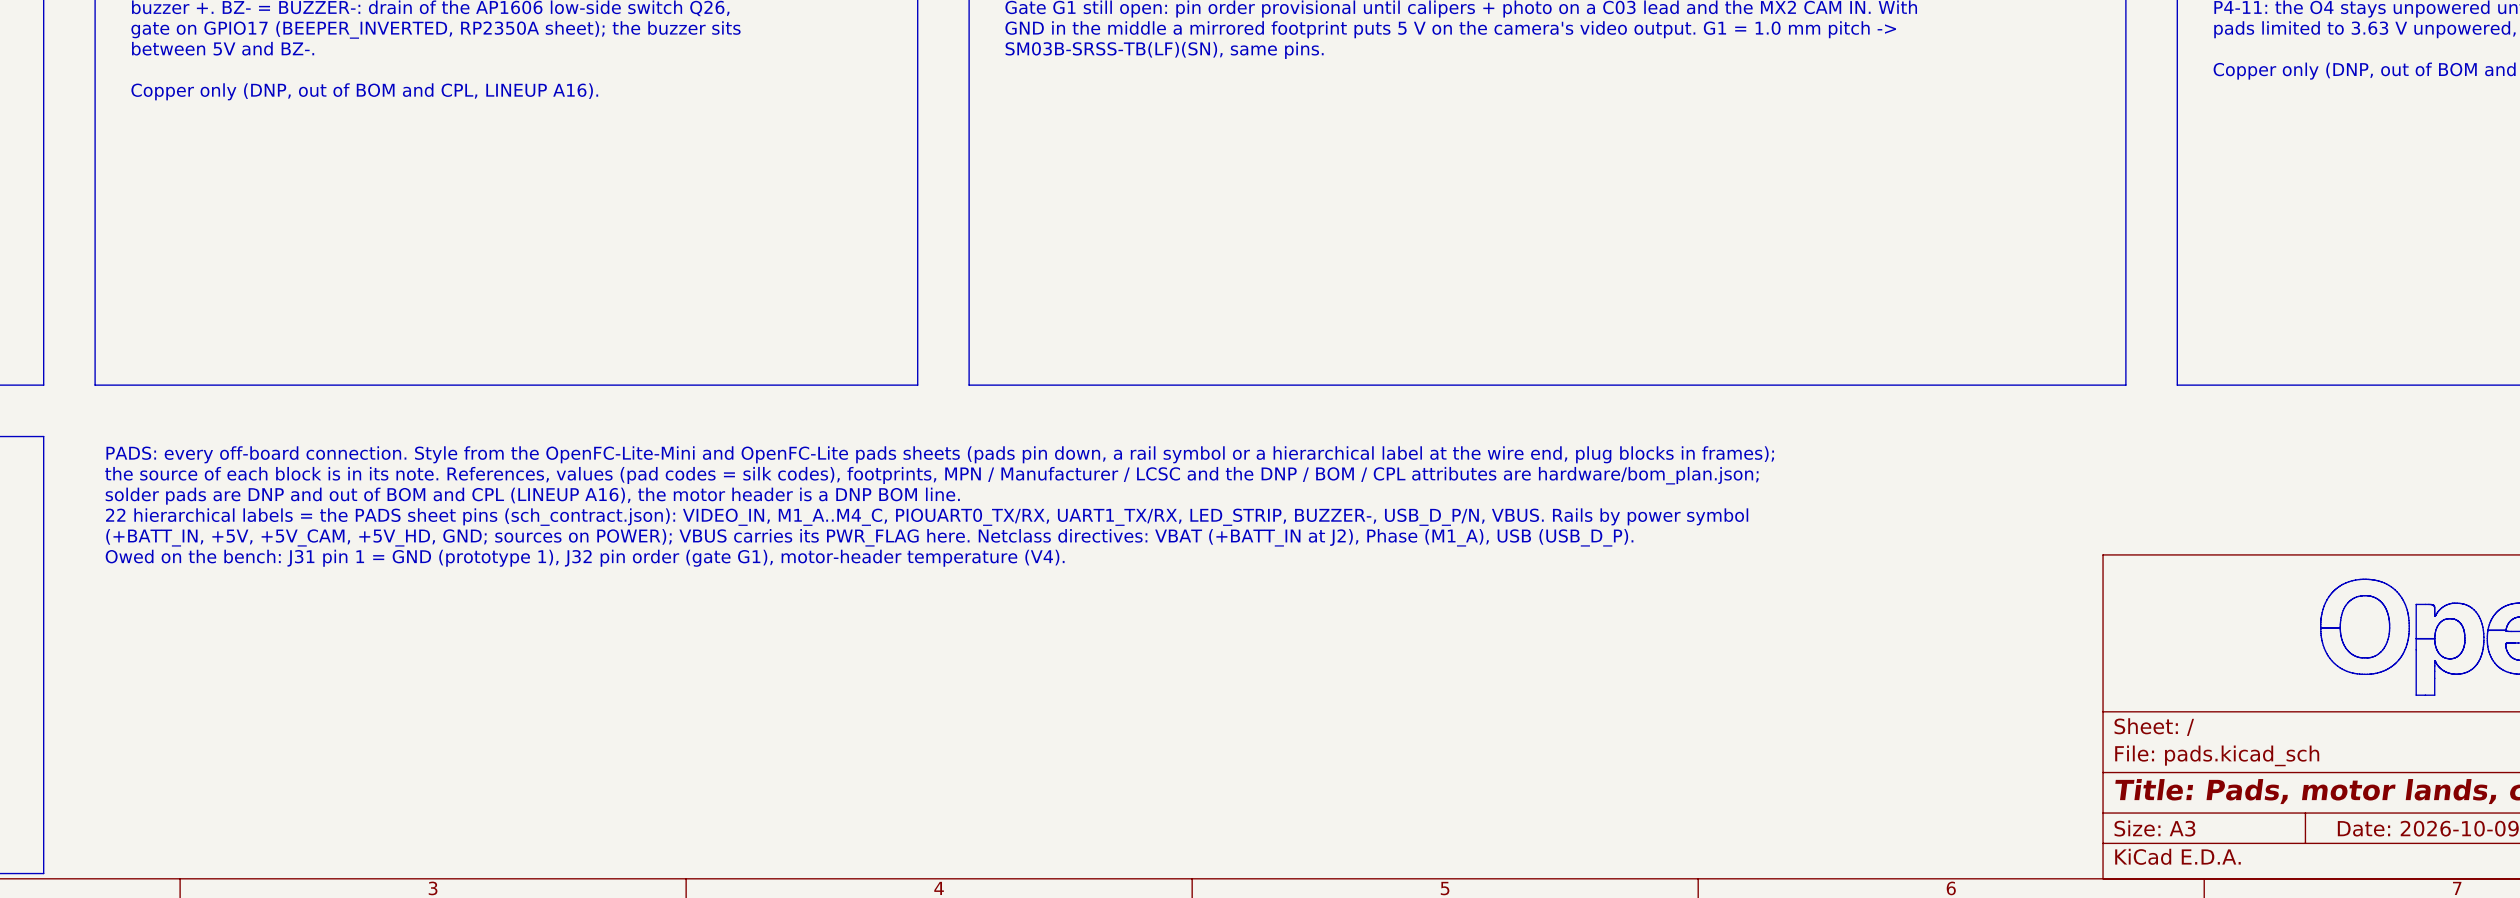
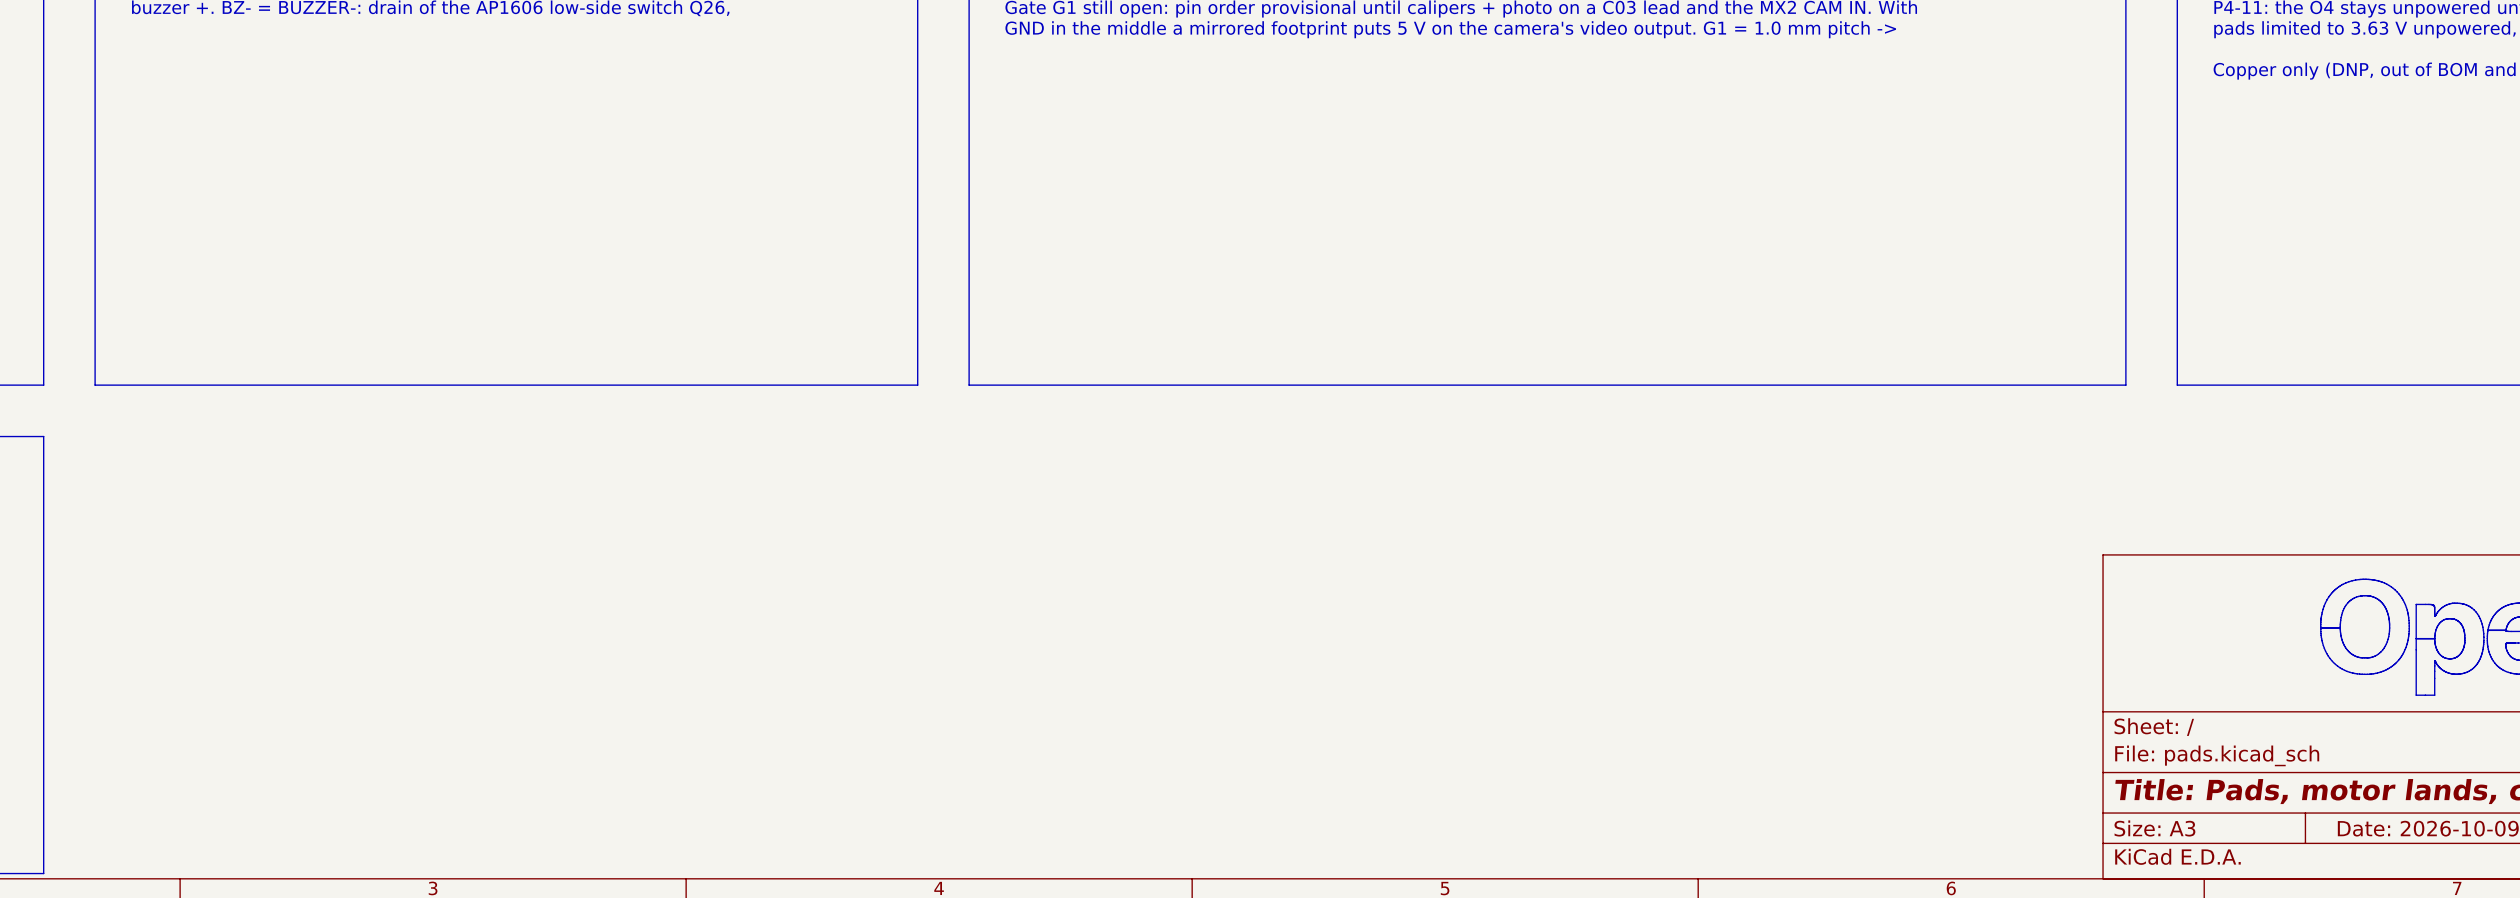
text: gate on GPIO17 (BEEPER_INVERTED, RP2350A sheet); the buzzer sits (436, 29) -> none
text: between 5V and BZ-. (223, 48) -> none
text: SM03B-SRSS-TB(LF)(SN), same pins. (1164, 50) -> none
text: Copper only (DNP, out of BOM and CPL, LINEUP A16). (364, 91) -> none
text: PADS: every off-board connection. Style from the OpenFC-Lite-Mini and OpenFC-Lite pads sheets (pads pin down, a rail symbol or a hierarchical label at the wire end, plug blocks in frames); (940, 454) -> none
text: the source of each block is in its note. References, values (pad codes = silk codes), footprints, MPN / Manufacturer / LCSC and the DNP / BOM / CPL attributes are hardware/bom_plan.json; (931, 475) -> none
text: solder pads are DNP and out of BOM and CPL (LINEUP A16), the motor header is a DNP BOM line. (532, 496) -> none
text: 22 hierarchical labels = the PADS sheet pins (sch_contract.json): VIDEO_IN, M1_A..M4_C, PIOUART0_TX/RX, UART1_TX/RX, LED_STRIP, BUZZER-, USB_D_P/N, VBUS. Rails by power symbol (927, 517) -> none
text: (+BATT_IN, +5V, +5V_CAM, +5V_HD, GND; sources on POWER); VBUS carries its PWR_FLAG here. Netclass directives: VBAT (+BATT_IN at J2), Phase (M1_A), USB (USB_D_P). (869, 537) -> none
text: Owed on the bench: J31 pin 1 = GND (prototype 1), J32 pin order (gate G1), motor-header temperature (V4). (585, 558) -> none

